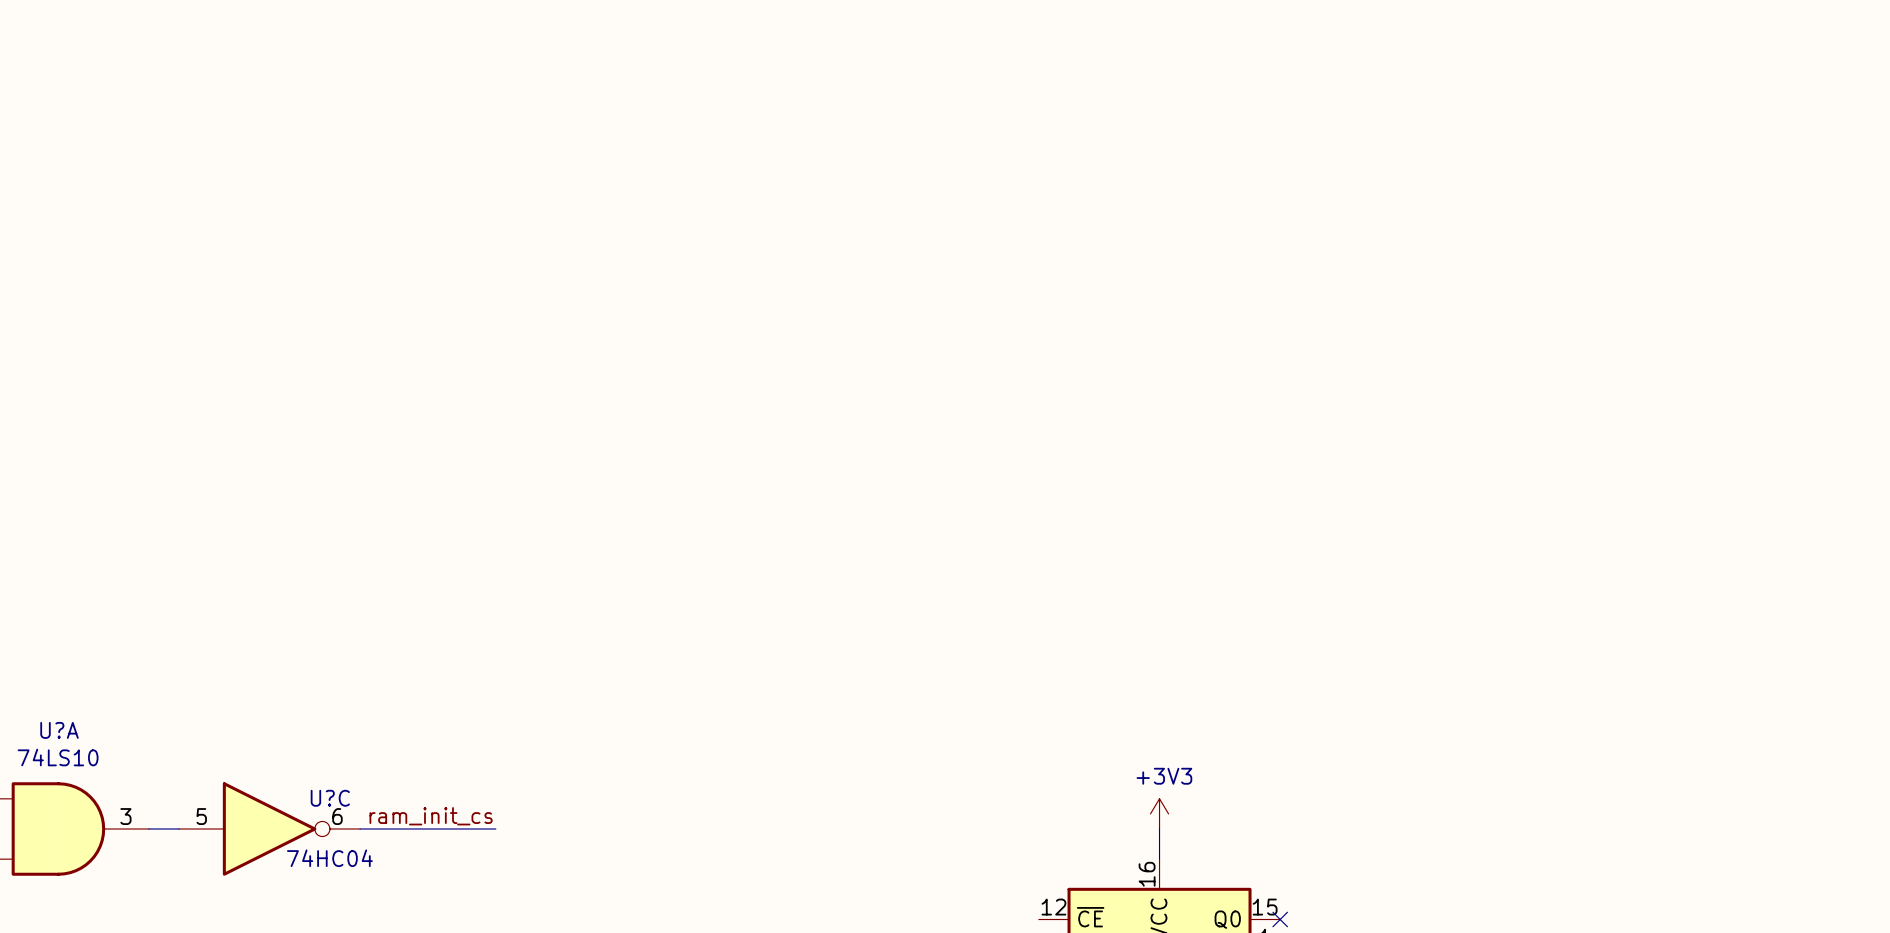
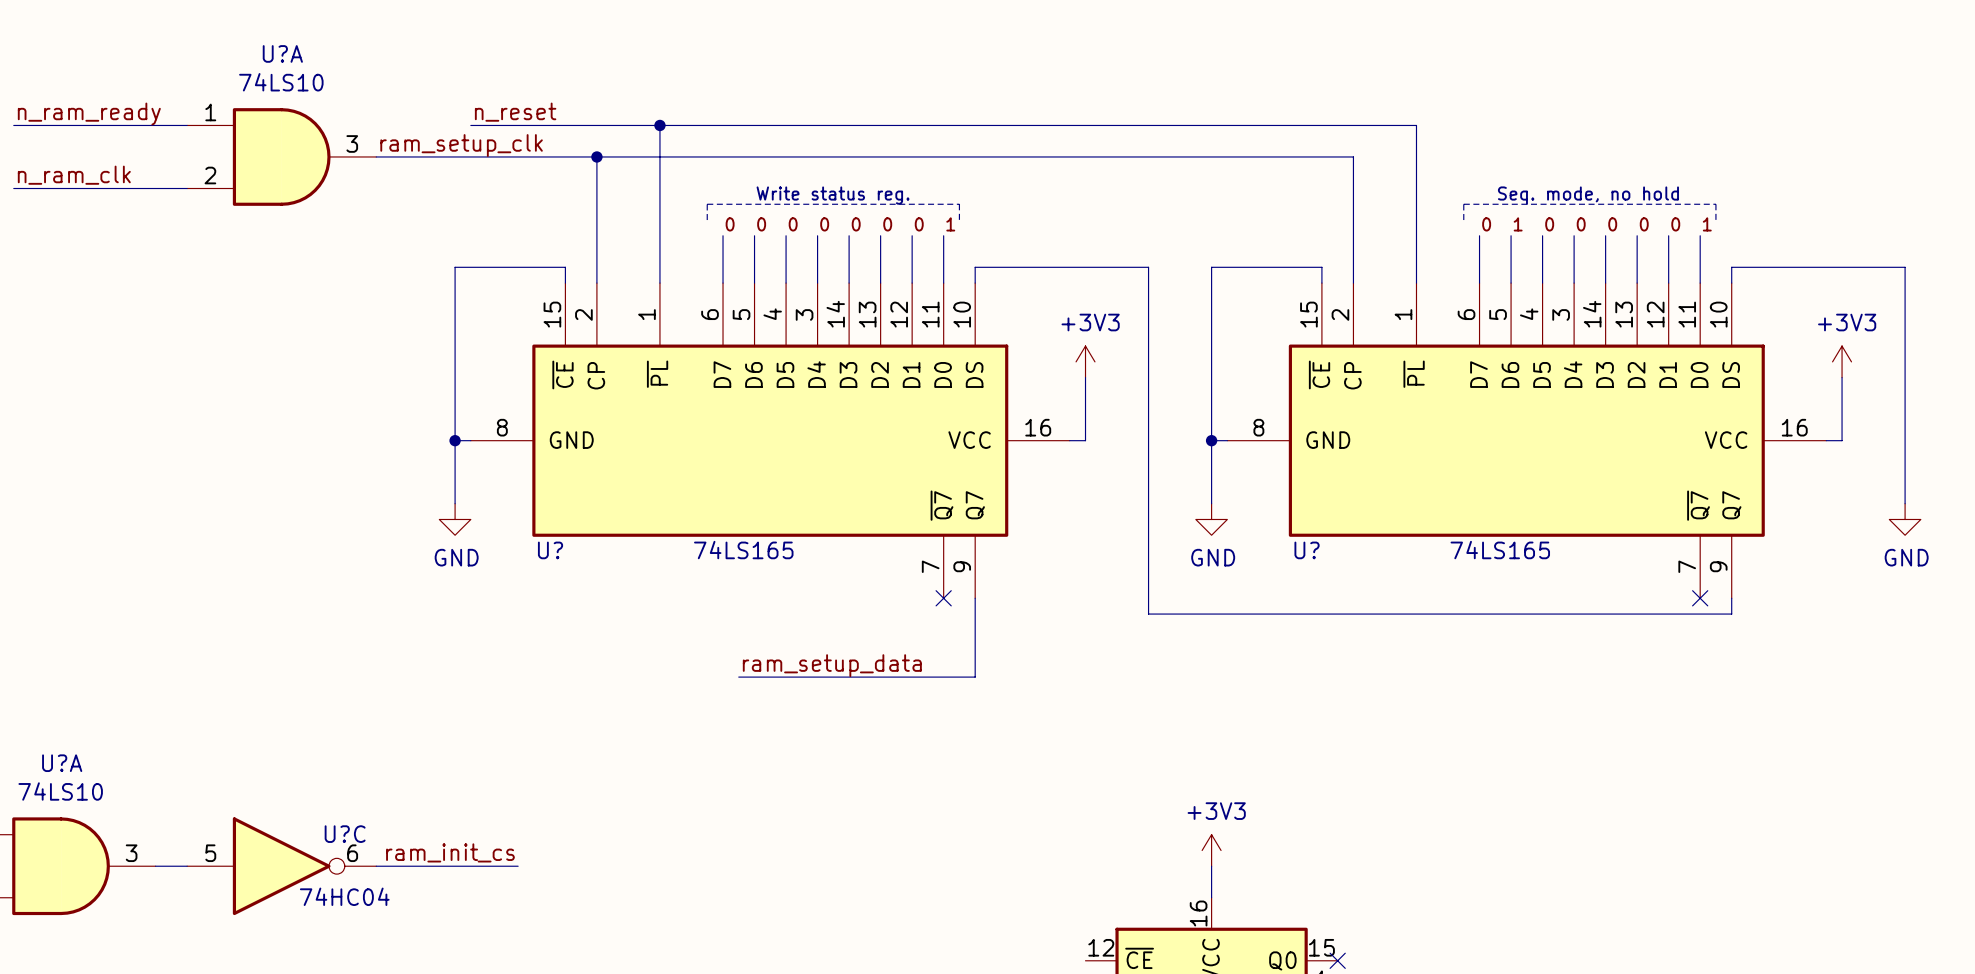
label: none -> n_reset (515, 112)
label: none -> n_ram_ready (89, 114)
wire: none -> (13, 125) (187, 125)
wire: none -> (470, 125) (1416, 125) (1416, 283)
wire: none -> (659, 125) (659, 283)
junction: none -> (659, 125)
label: none -> ram_setup_clk (461, 145)
U?A: none -> 74LS10 (281, 156)
wire: none -> (376, 156) (1353, 156) (1353, 283)
wire: none -> (596, 156) (596, 283)
junction: none -> (596, 156)
label: none -> n_ram_clk (74, 175)
wire: none -> (13, 188) (187, 188)
text: none -> Write status reg. (833, 195)
text: none -> Seq. mode, no hold (1588, 195)
line: none -> (707, 220) (707, 204) (959, 204) (959, 220)
line: none -> (1463, 220) (1463, 204) (1715, 204) (1715, 220)
label: none -> 0 (730, 224)
label: none -> 0 (761, 224)
label: none -> 0 (793, 224)
label: none -> 0 (824, 224)
label: none -> 0 (856, 224)
label: none -> 0 (887, 224)
label: none -> 0 (919, 224)
label: none -> 1 (950, 224)
label: none -> 0 (1486, 224)
label: none -> 1 (1518, 224)
label: none -> 0 (1549, 224)
label: none -> 0 (1581, 224)
label: none -> 0 (1612, 224)
label: none -> 0 (1644, 224)
label: none -> 0 (1675, 224)
label: none -> 1 (1707, 224)
wire: none -> (723, 235) (723, 283)
wire: none -> (754, 235) (754, 283)
wire: none -> (786, 235) (786, 283)
wire: none -> (817, 235) (817, 283)
wire: none -> (849, 235) (849, 283)
wire: none -> (880, 235) (880, 283)
wire: none -> (912, 235) (912, 283)
wire: none -> (943, 235) (943, 283)
wire: none -> (1479, 235) (1479, 283)
wire: none -> (1511, 235) (1511, 283)
wire: none -> (1542, 235) (1542, 283)
wire: none -> (1574, 235) (1574, 283)
wire: none -> (1605, 235) (1605, 283)
wire: none -> (1637, 235) (1637, 283)
wire: none -> (1668, 235) (1668, 283)
wire: none -> (1700, 235) (1700, 283)
wire: none -> (565, 283) (565, 267) (455, 267) (455, 503)
wire: none -> (975, 283) (975, 267) (1148, 267) (1148, 614) (1731, 614) (1731, 598)
wire: none -> (1321, 283) (1321, 267) (1211, 267) (1211, 503)
wire: none -> (1731, 283) (1731, 267) (1905, 267) (1905, 503)
power symbol: none -> +3V3 (1085, 361)
power symbol: none -> +3V3 (1842, 361)
wire: none -> (1085, 377) (1085, 440) (1069, 440)
wire: none -> (1842, 377) (1842, 440) (1826, 440)
wire: none -> (455, 440) (470, 440)
junction: none -> (455, 440)
U?: none -> 74LS165 (770, 440)
wire: none -> (1211, 440) (1227, 440)
junction: none -> (1211, 440)
U?: none -> 74LS165 (1526, 440)
power symbol: none -> GND (455, 519)
power symbol: none -> GND (1211, 519)
power symbol: none -> GND (1905, 519)
no-connect mark: none -> (943, 598)
wire: none -> (975, 598) (975, 677) (738, 677)
no-connect mark: none -> (1700, 598)
label: none -> ram_setup_data (832, 665)

